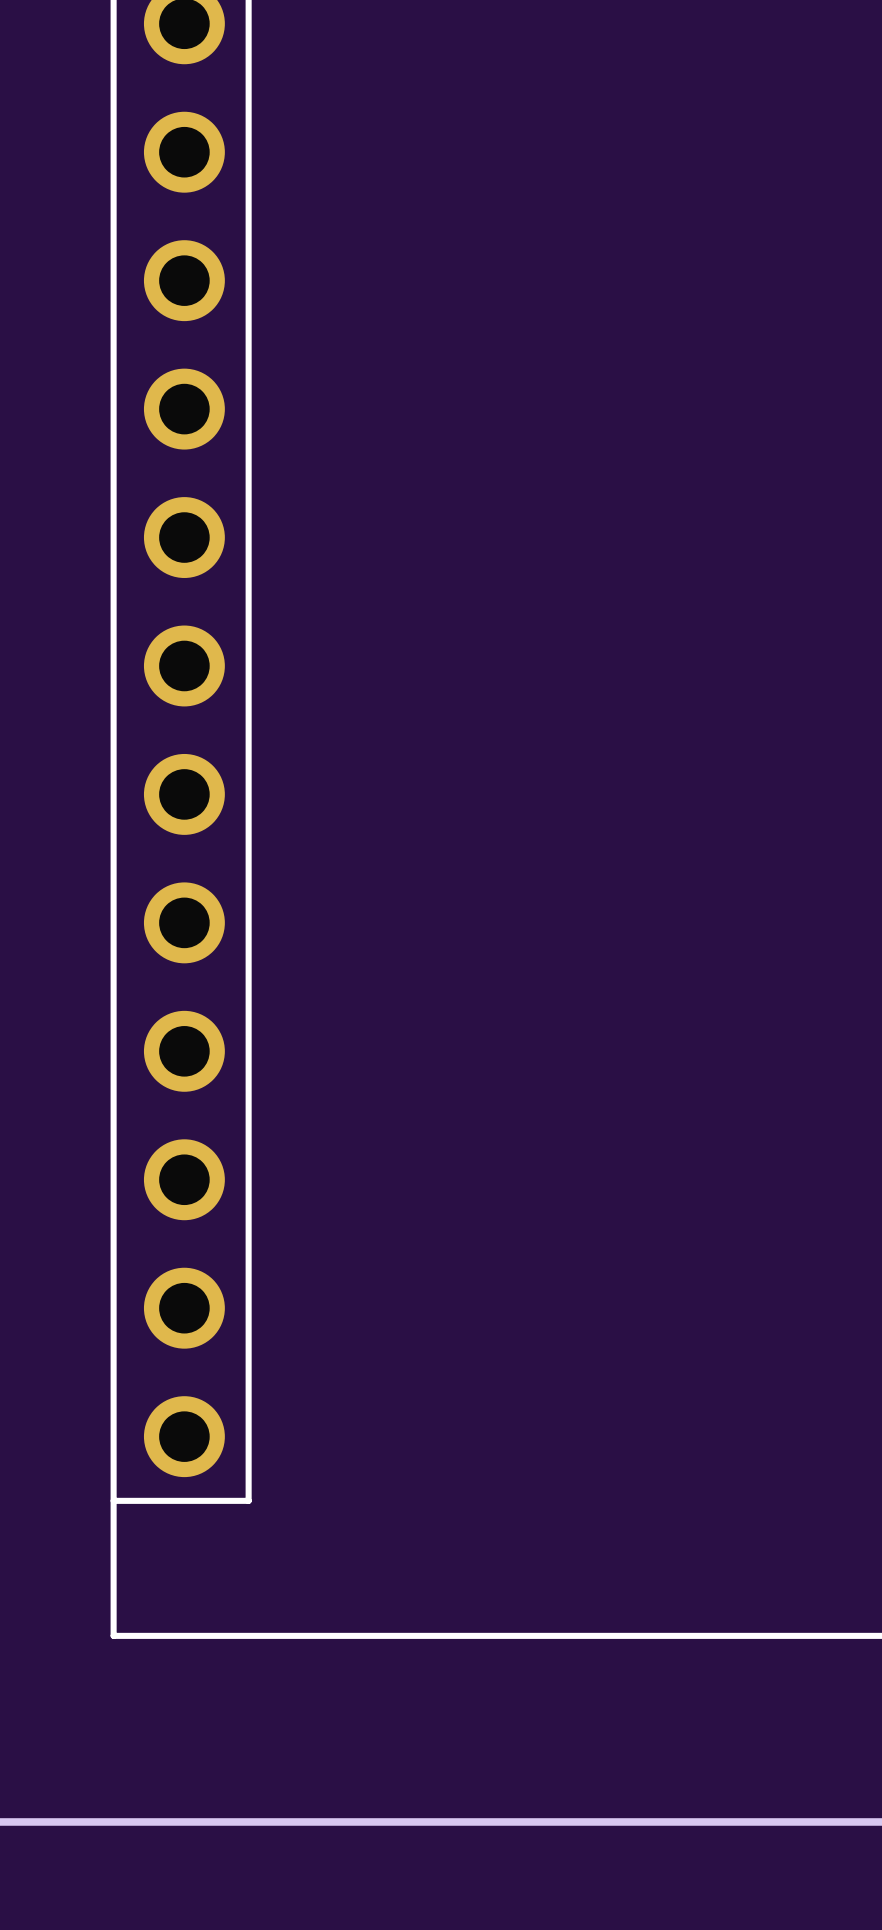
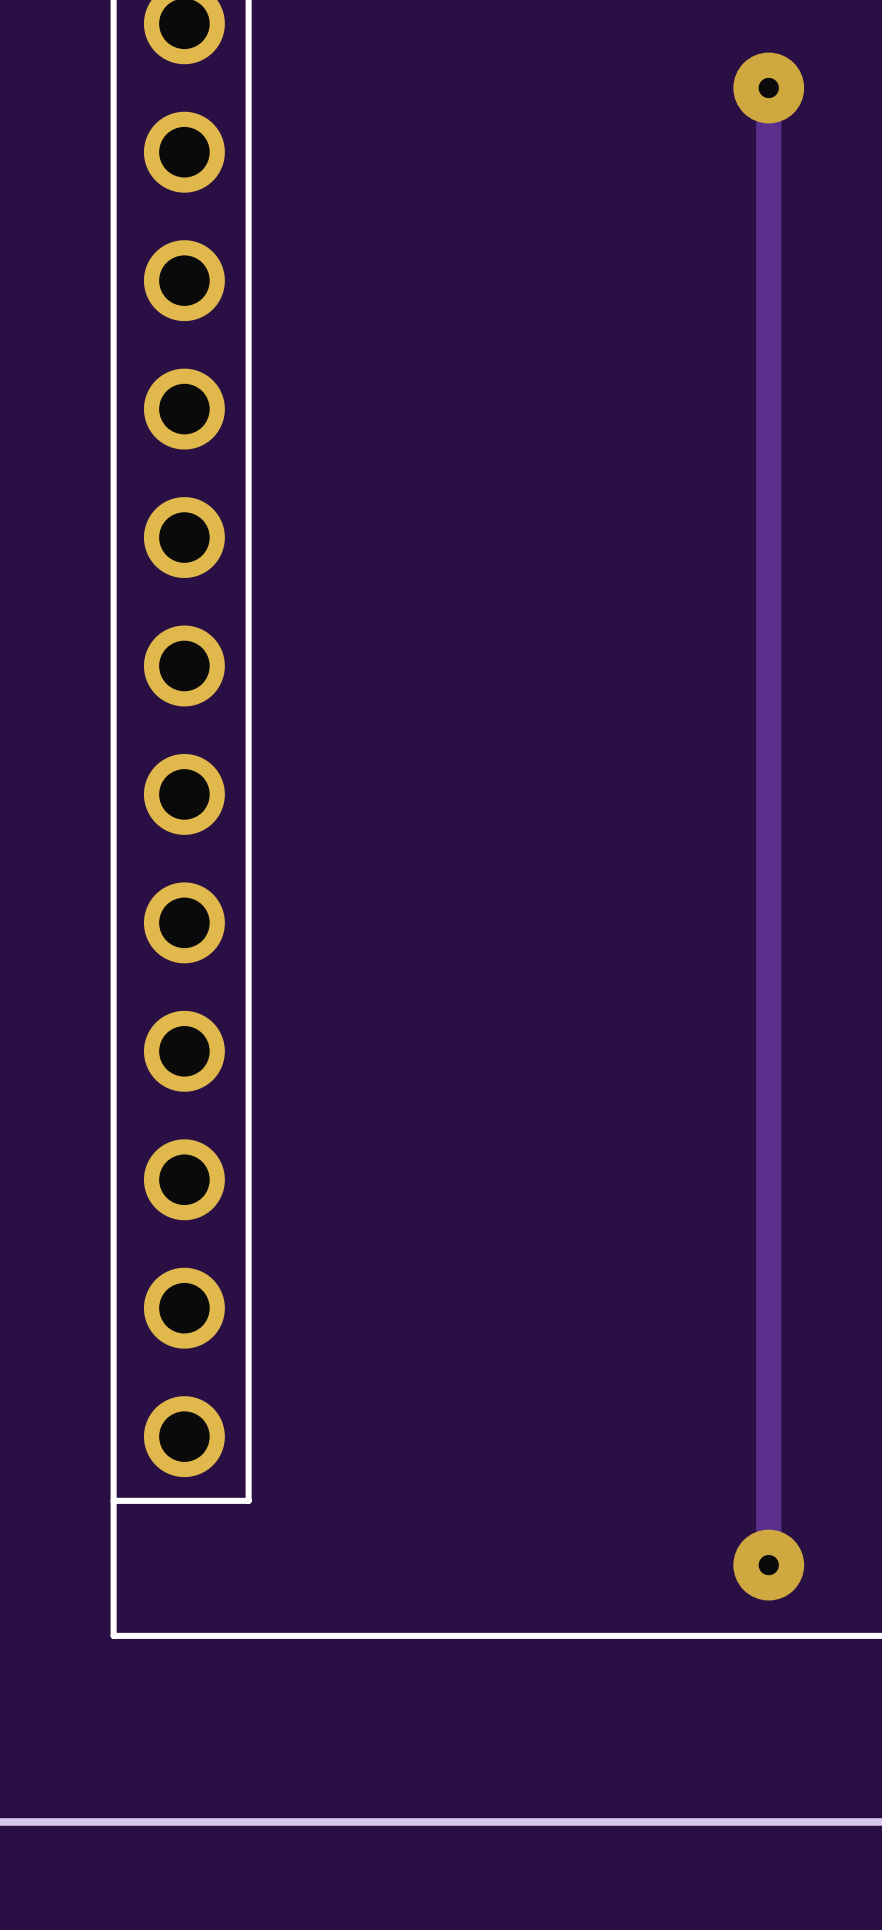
track: none -> (768, 87) (768, 1565)
via: none -> (768, 87)
via: none -> (768, 1565)

